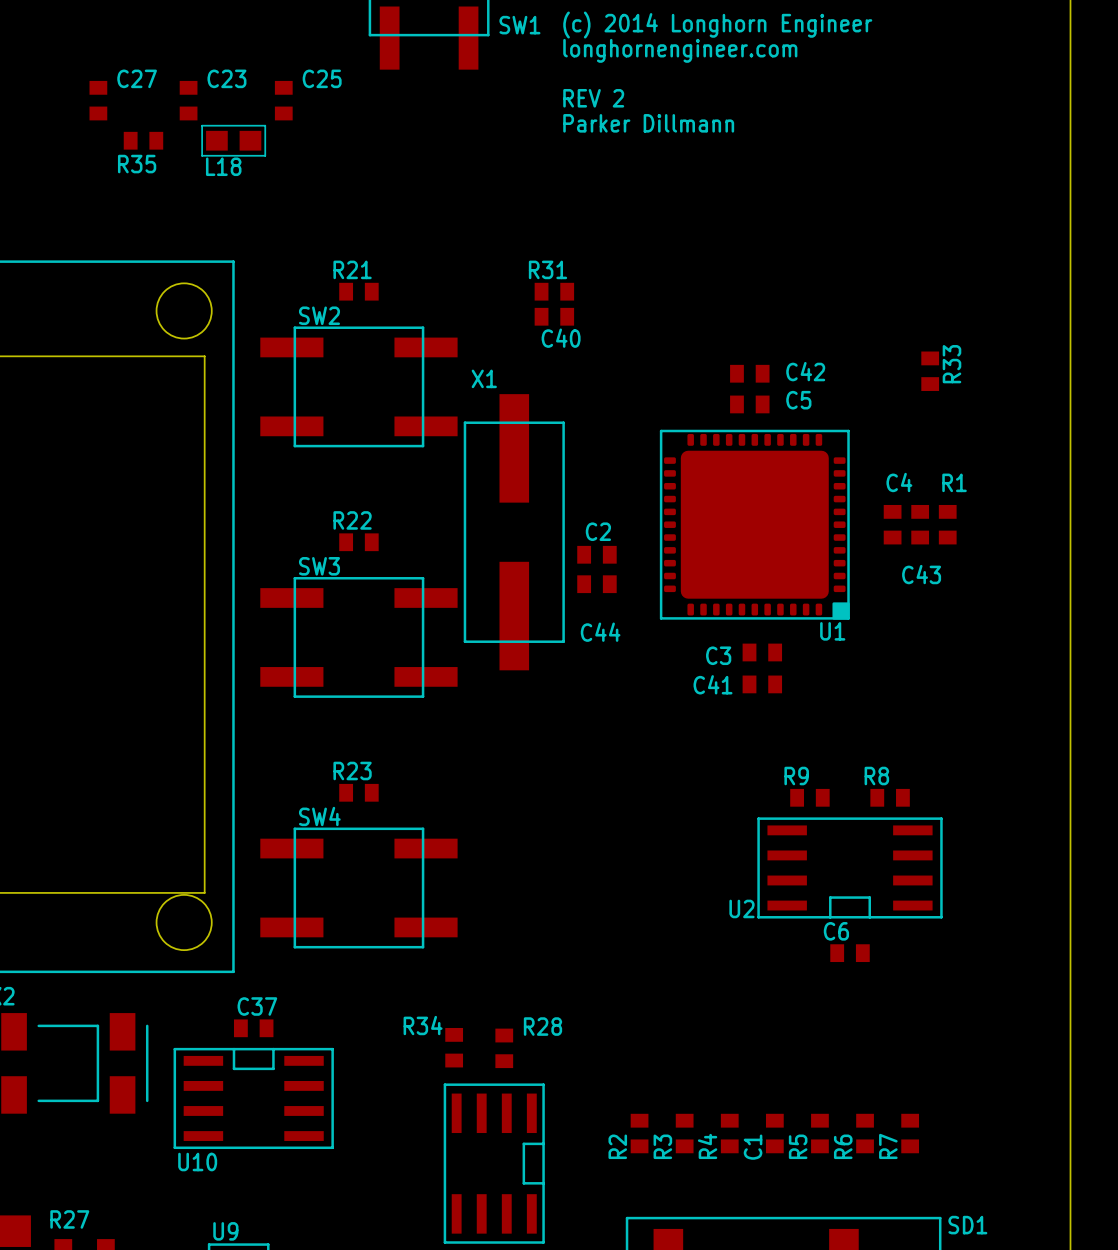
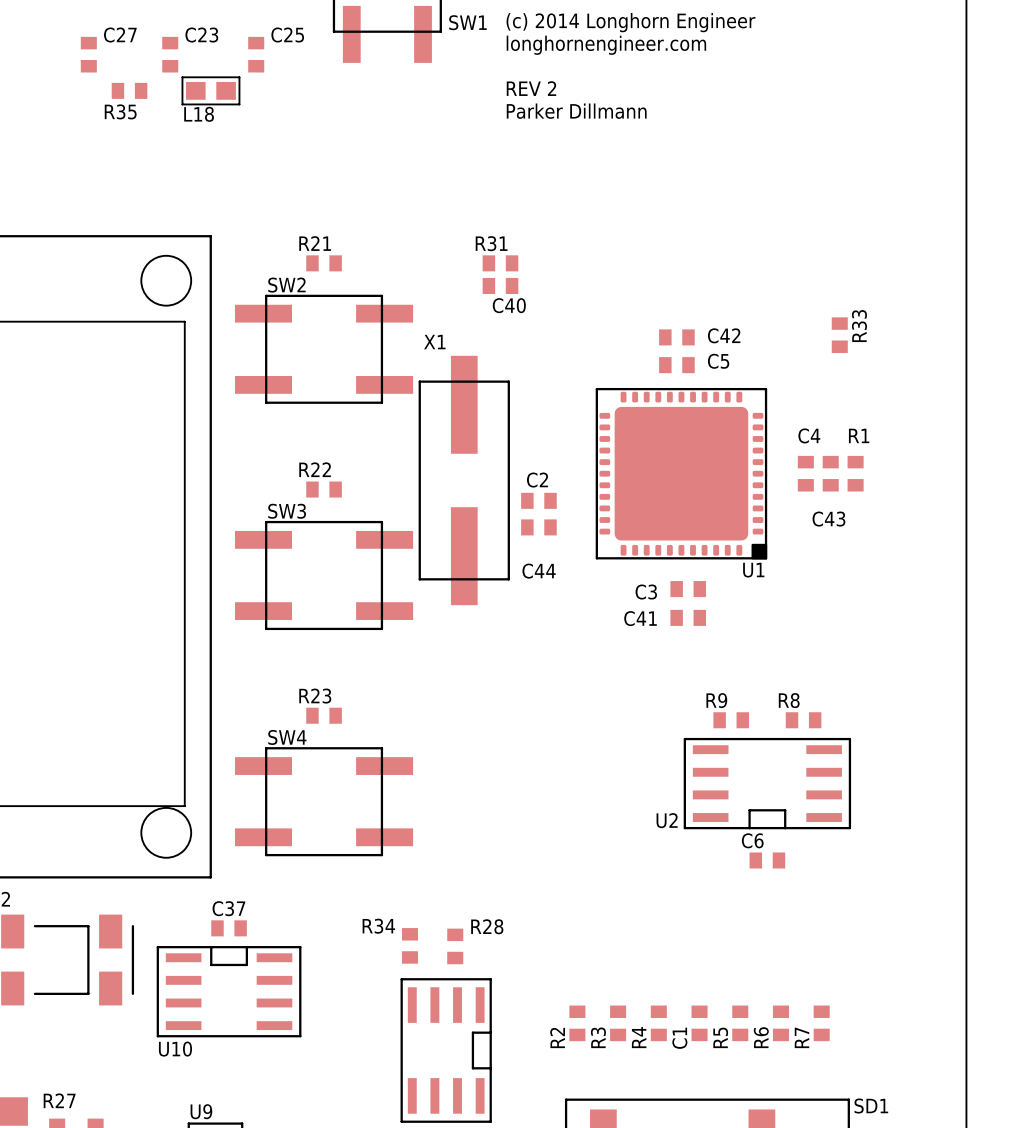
C27 position: (98, 100) -> (88, 54)
C23 position: (188, 100) -> (170, 54)
C25 position: (283, 100) -> (256, 54)
R35 position: (143, 140) -> (129, 90)
L18 position: (233, 140) -> (210, 90)

